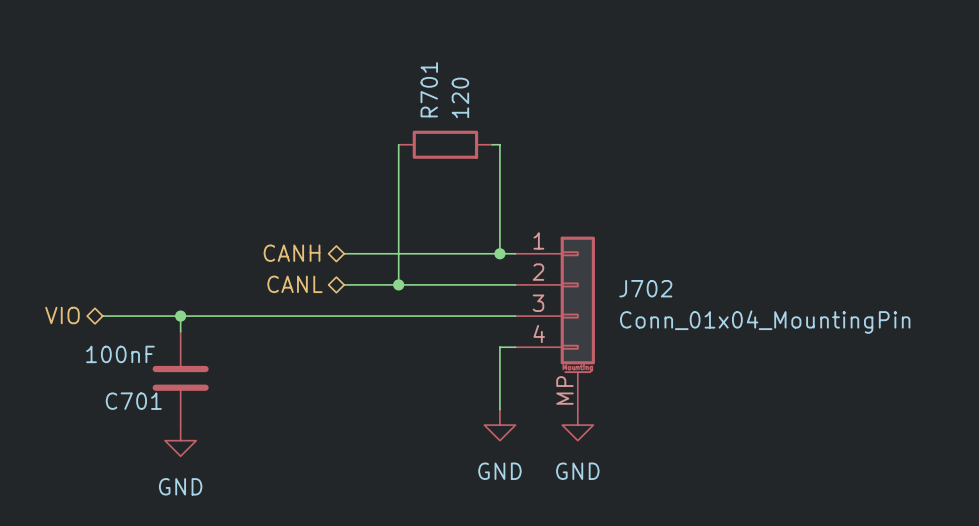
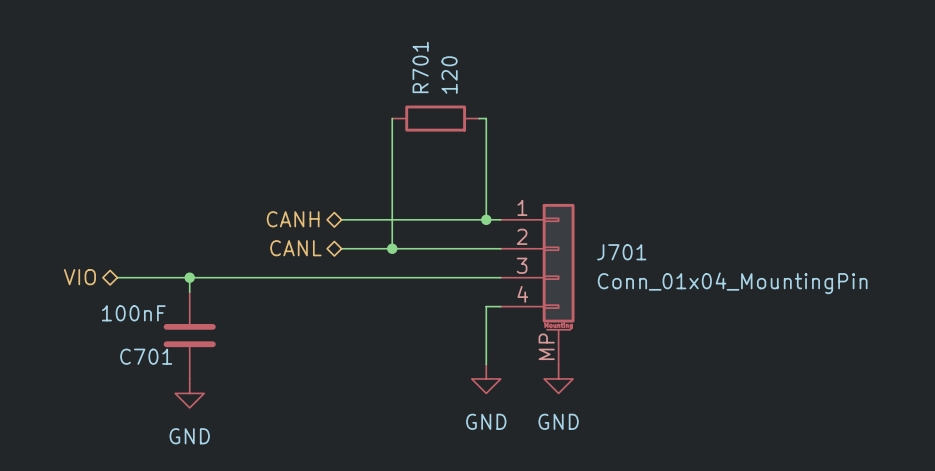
J702 name: J702 (645, 288) -> J701 (621, 252)

